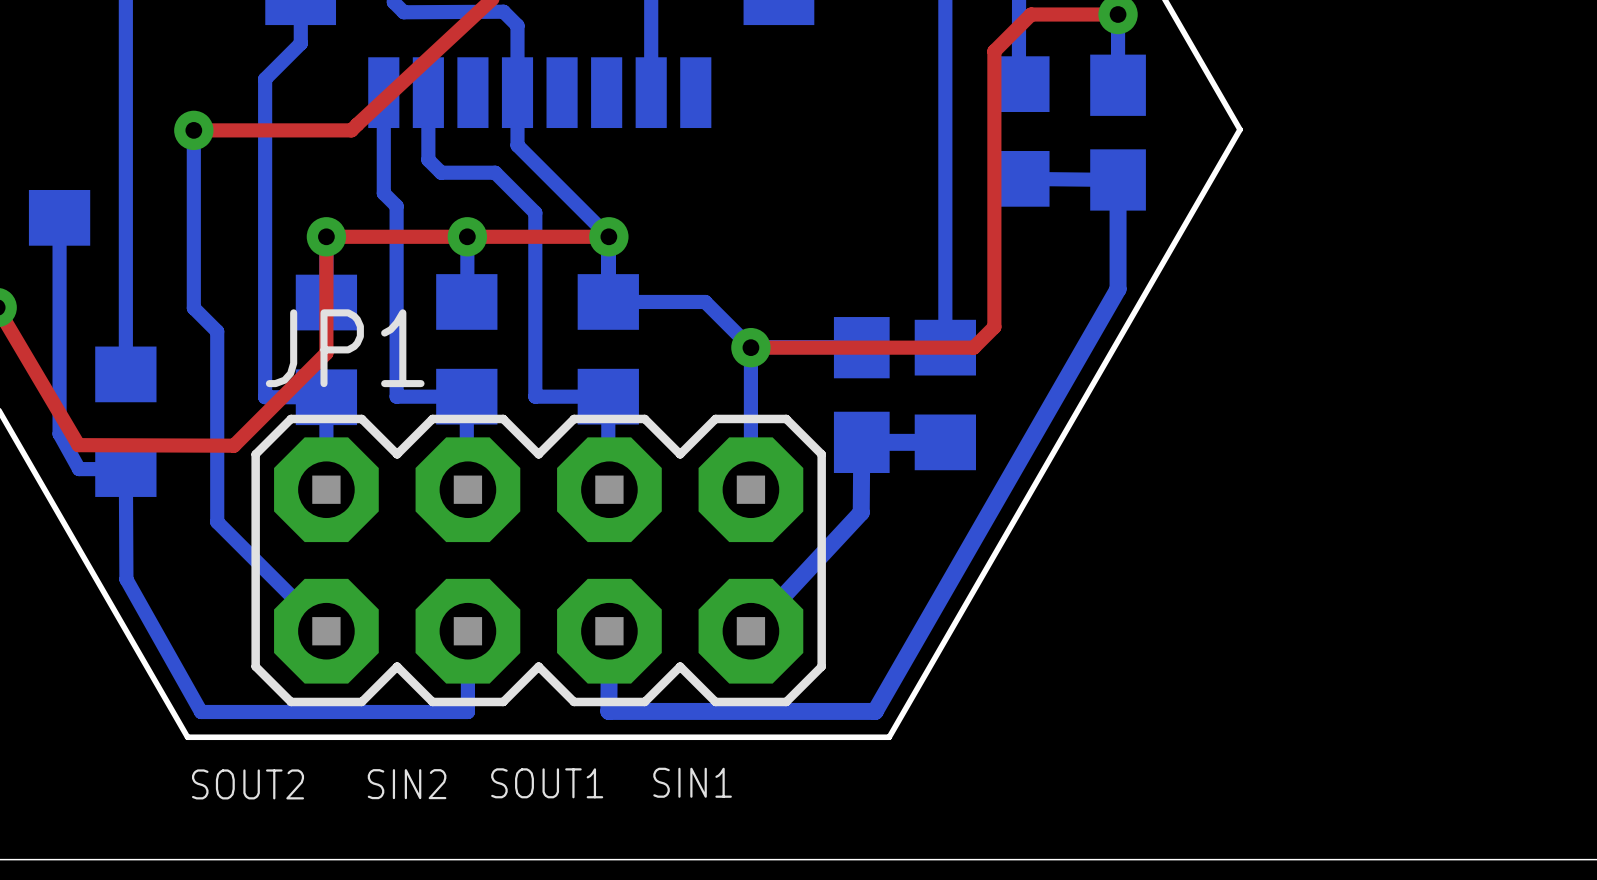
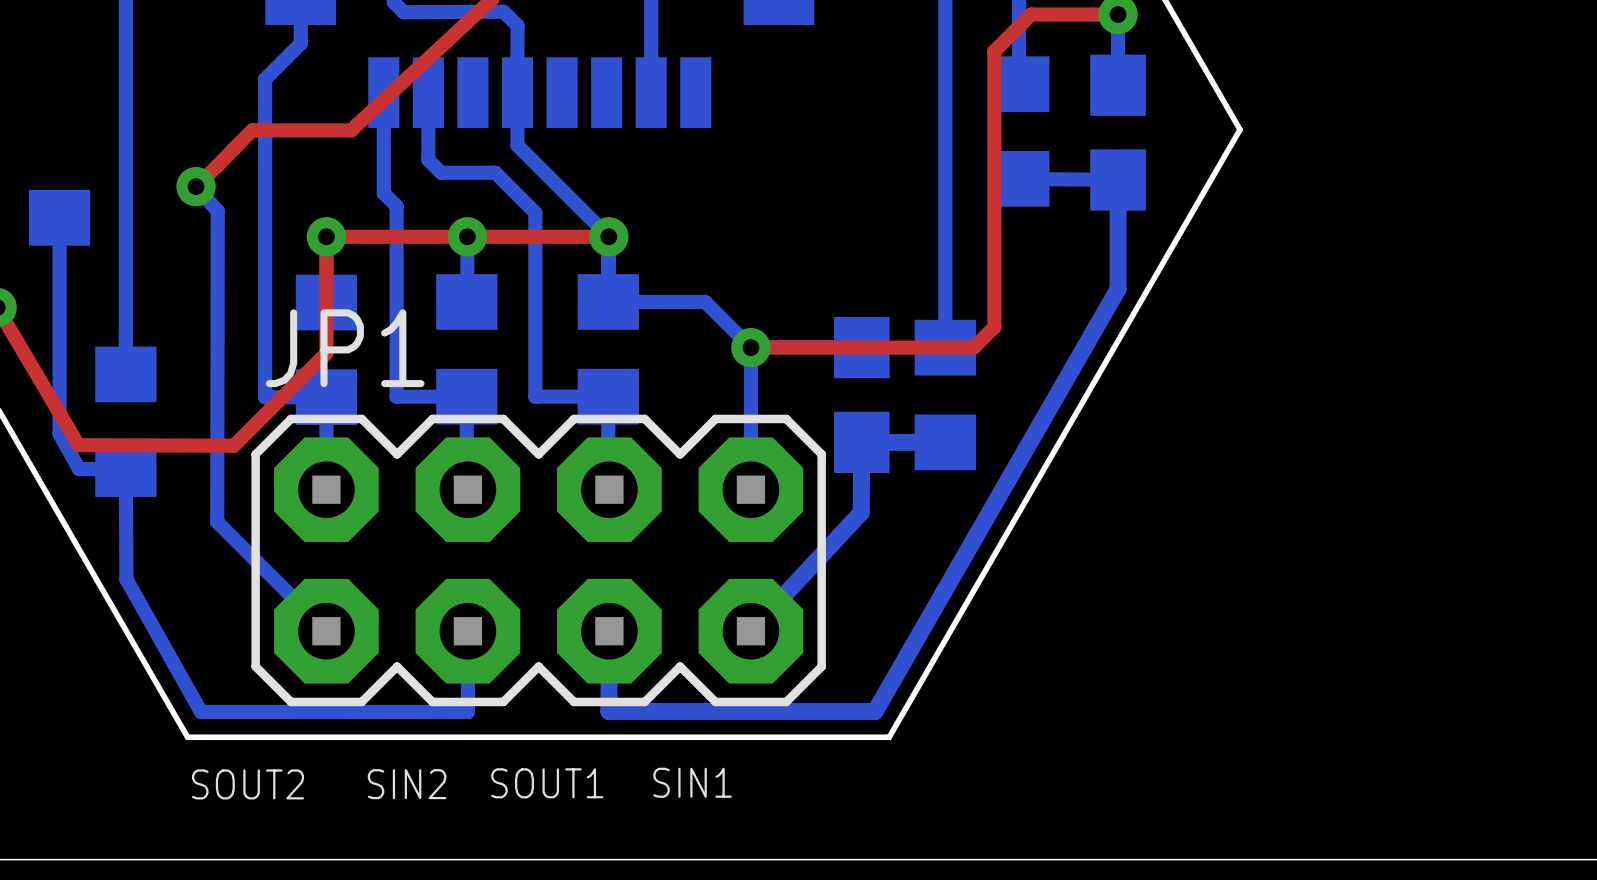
bottom track: (193, 130) (193, 308) (217, 331) (217, 522) -> (196, 186) (217, 211) (217, 522)
top track: (193, 130) (252, 130) -> (196, 186) (252, 130)
via position: (193, 130) -> (196, 186)

